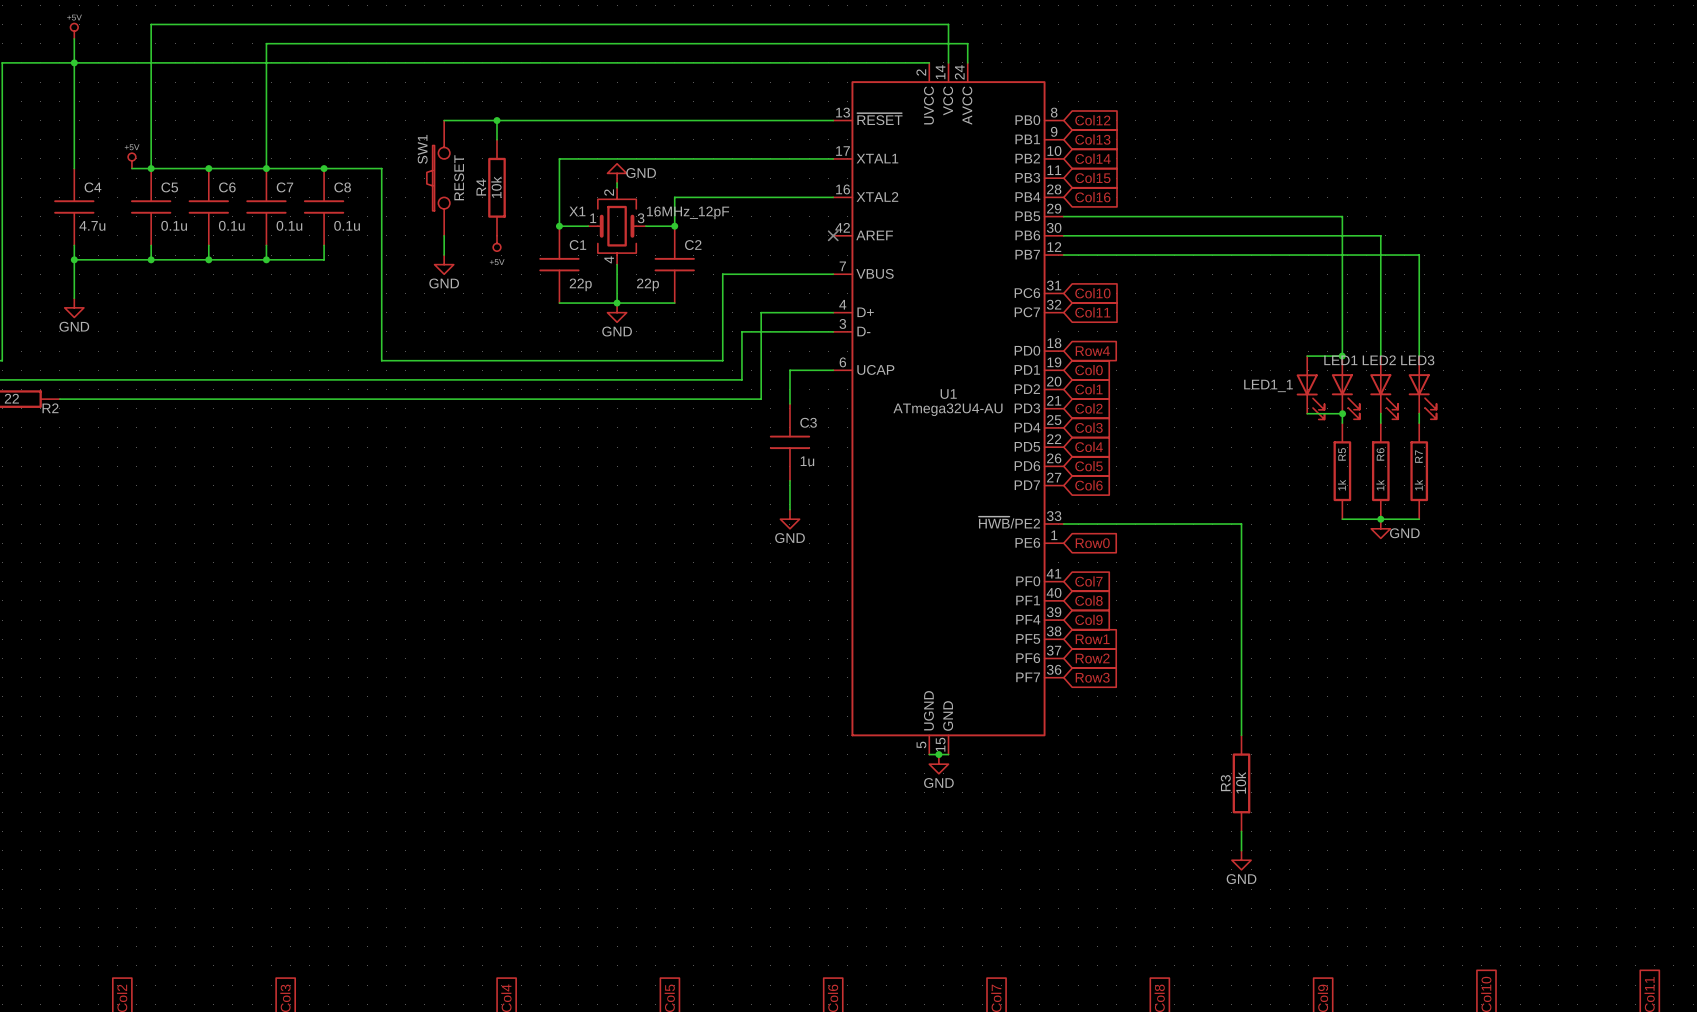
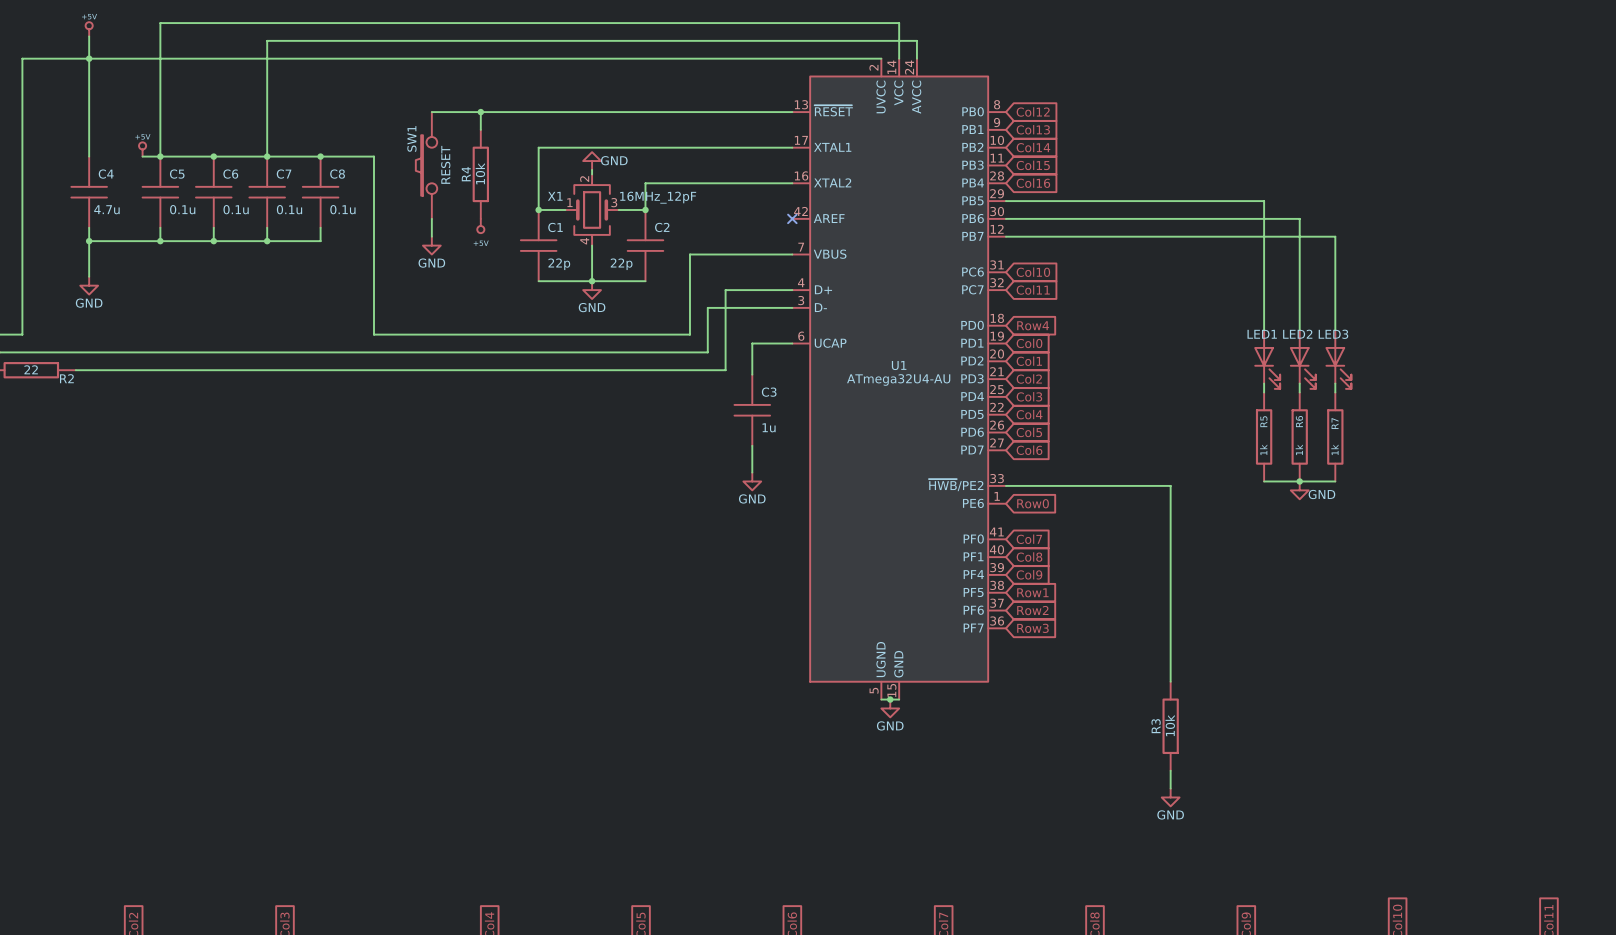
wire: (1307, 356) (1342, 356) -> none
junction: (1342, 356) -> none
LED1_1: (1310, 387) -> none
wire: (1307, 413) (1342, 413) -> none
junction: (1342, 413) -> none

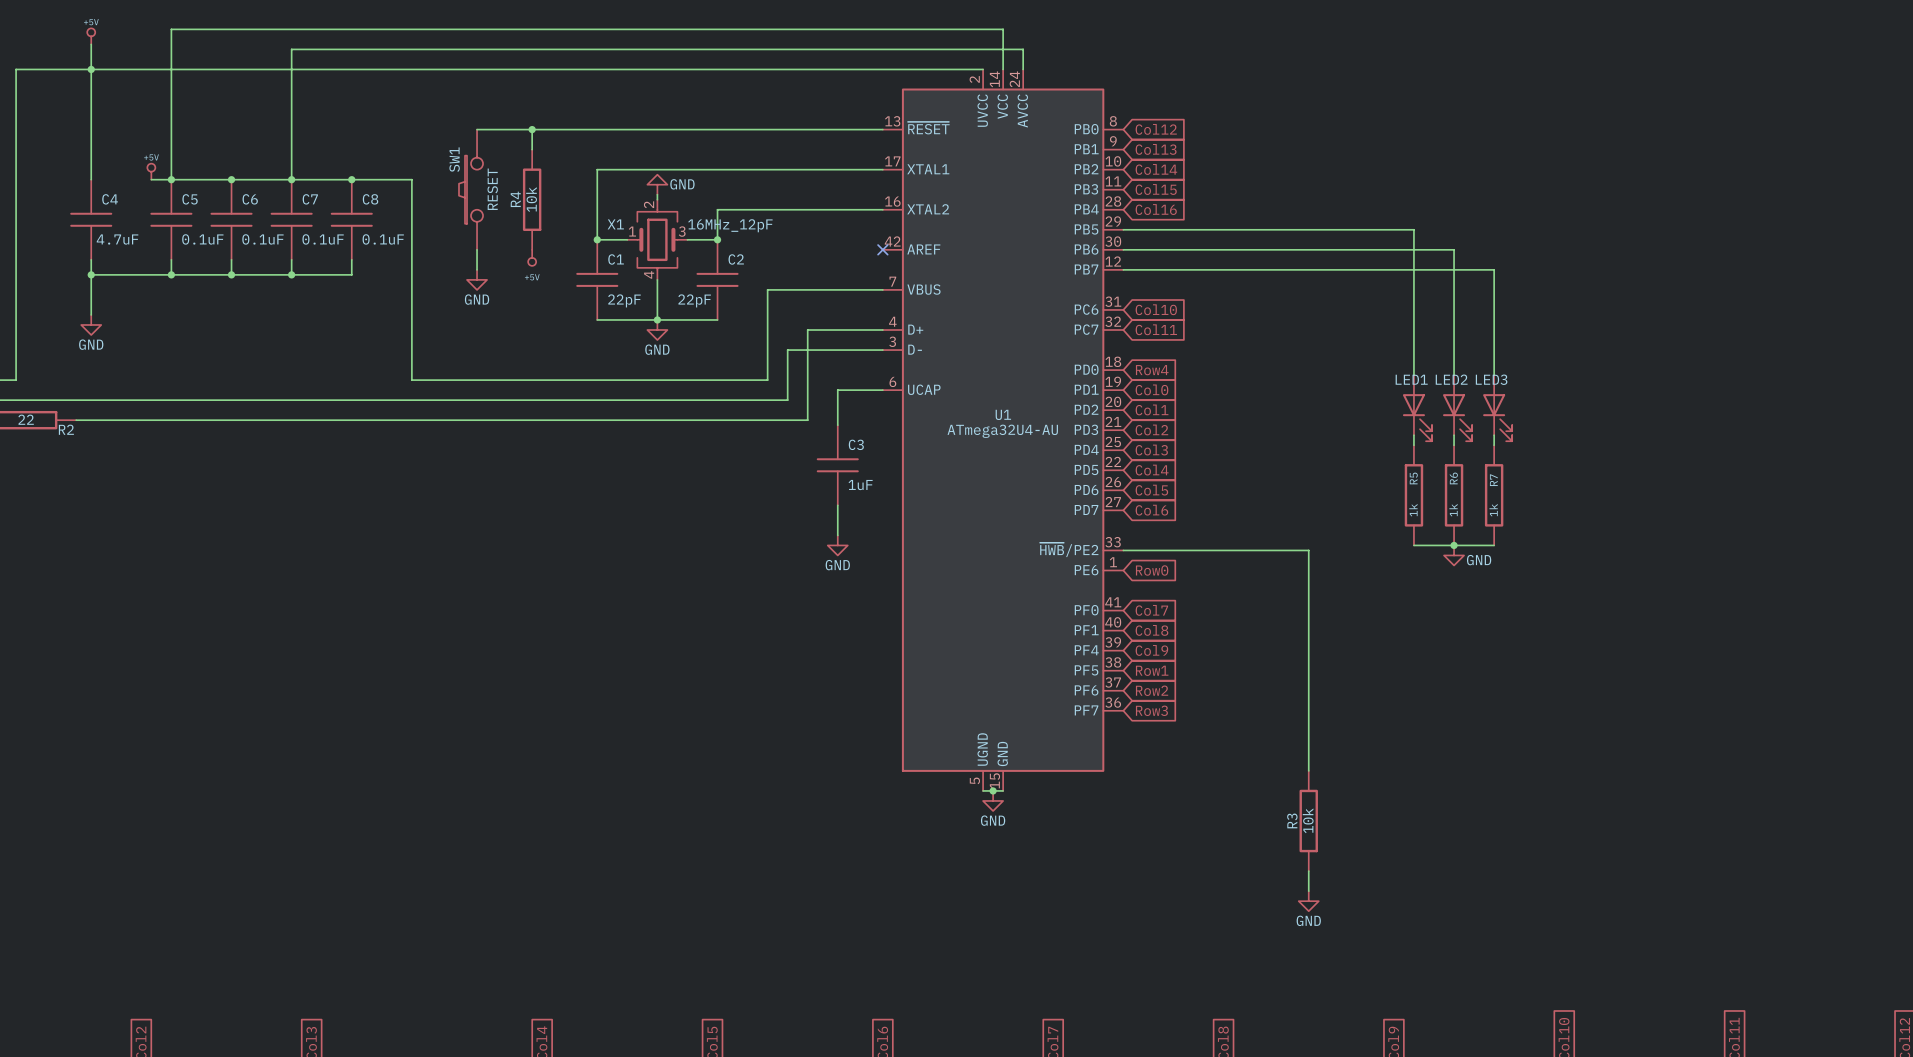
C4 value: 4.7u (106, 209) -> 4.7uF (117, 239)
C5 value: 0.1u (182, 209) -> 0.1uF (202, 239)
C6 value: 0.1u (236, 209) -> 0.1uF (262, 239)
C7 value: 0.1u (289, 209) -> 0.1uF (323, 239)
C8 value: 0.1u (342, 209) -> 0.1uF (383, 239)
C1 value: 22p (559, 264) -> 22pF (624, 300)
C2 value: 22p (621, 264) -> 22pF (694, 300)
C3 value: 1u (769, 427) -> 1uF (860, 485)

